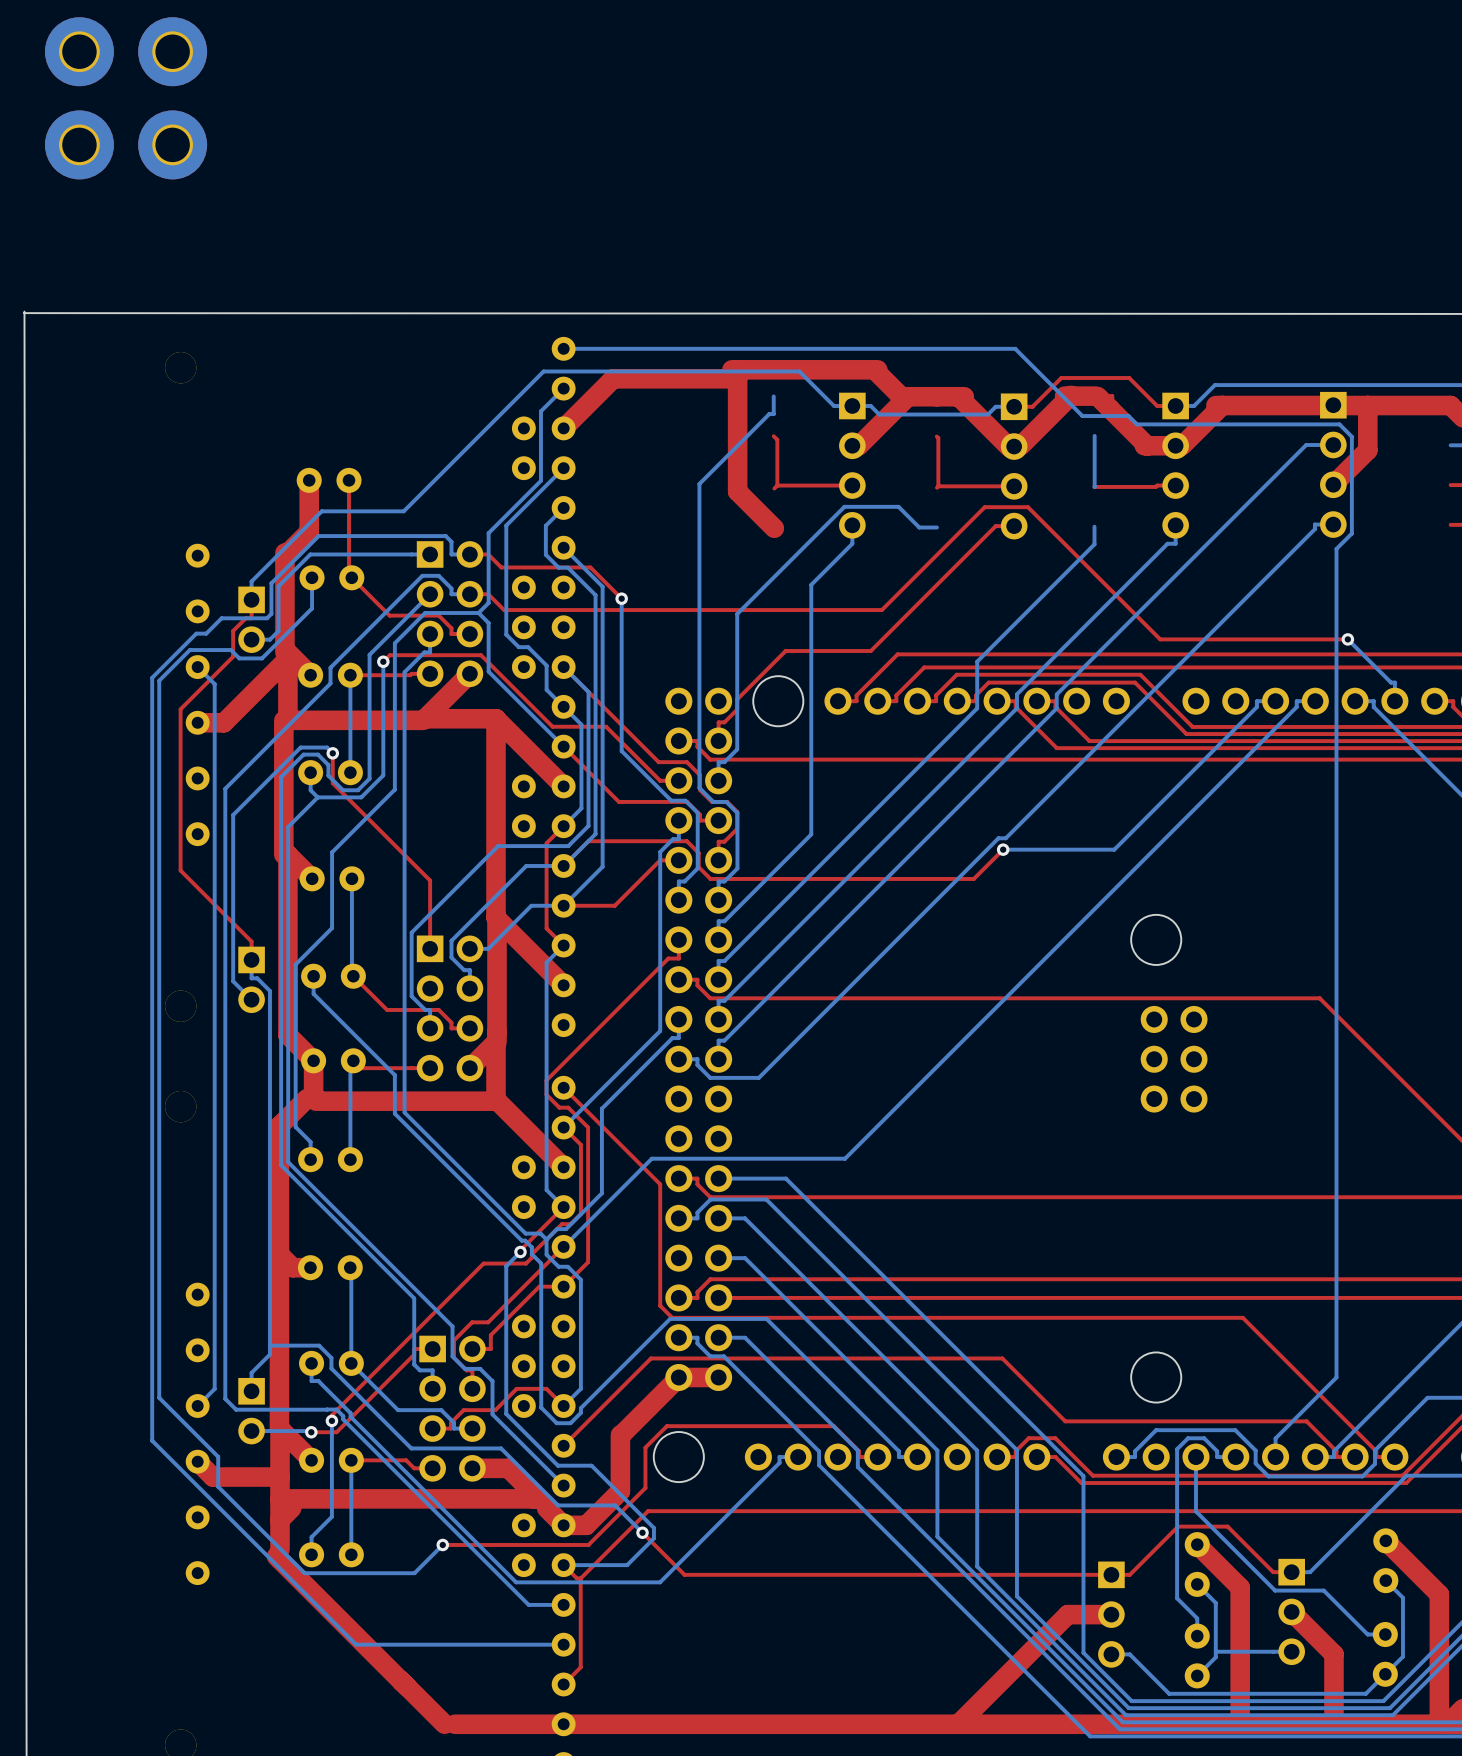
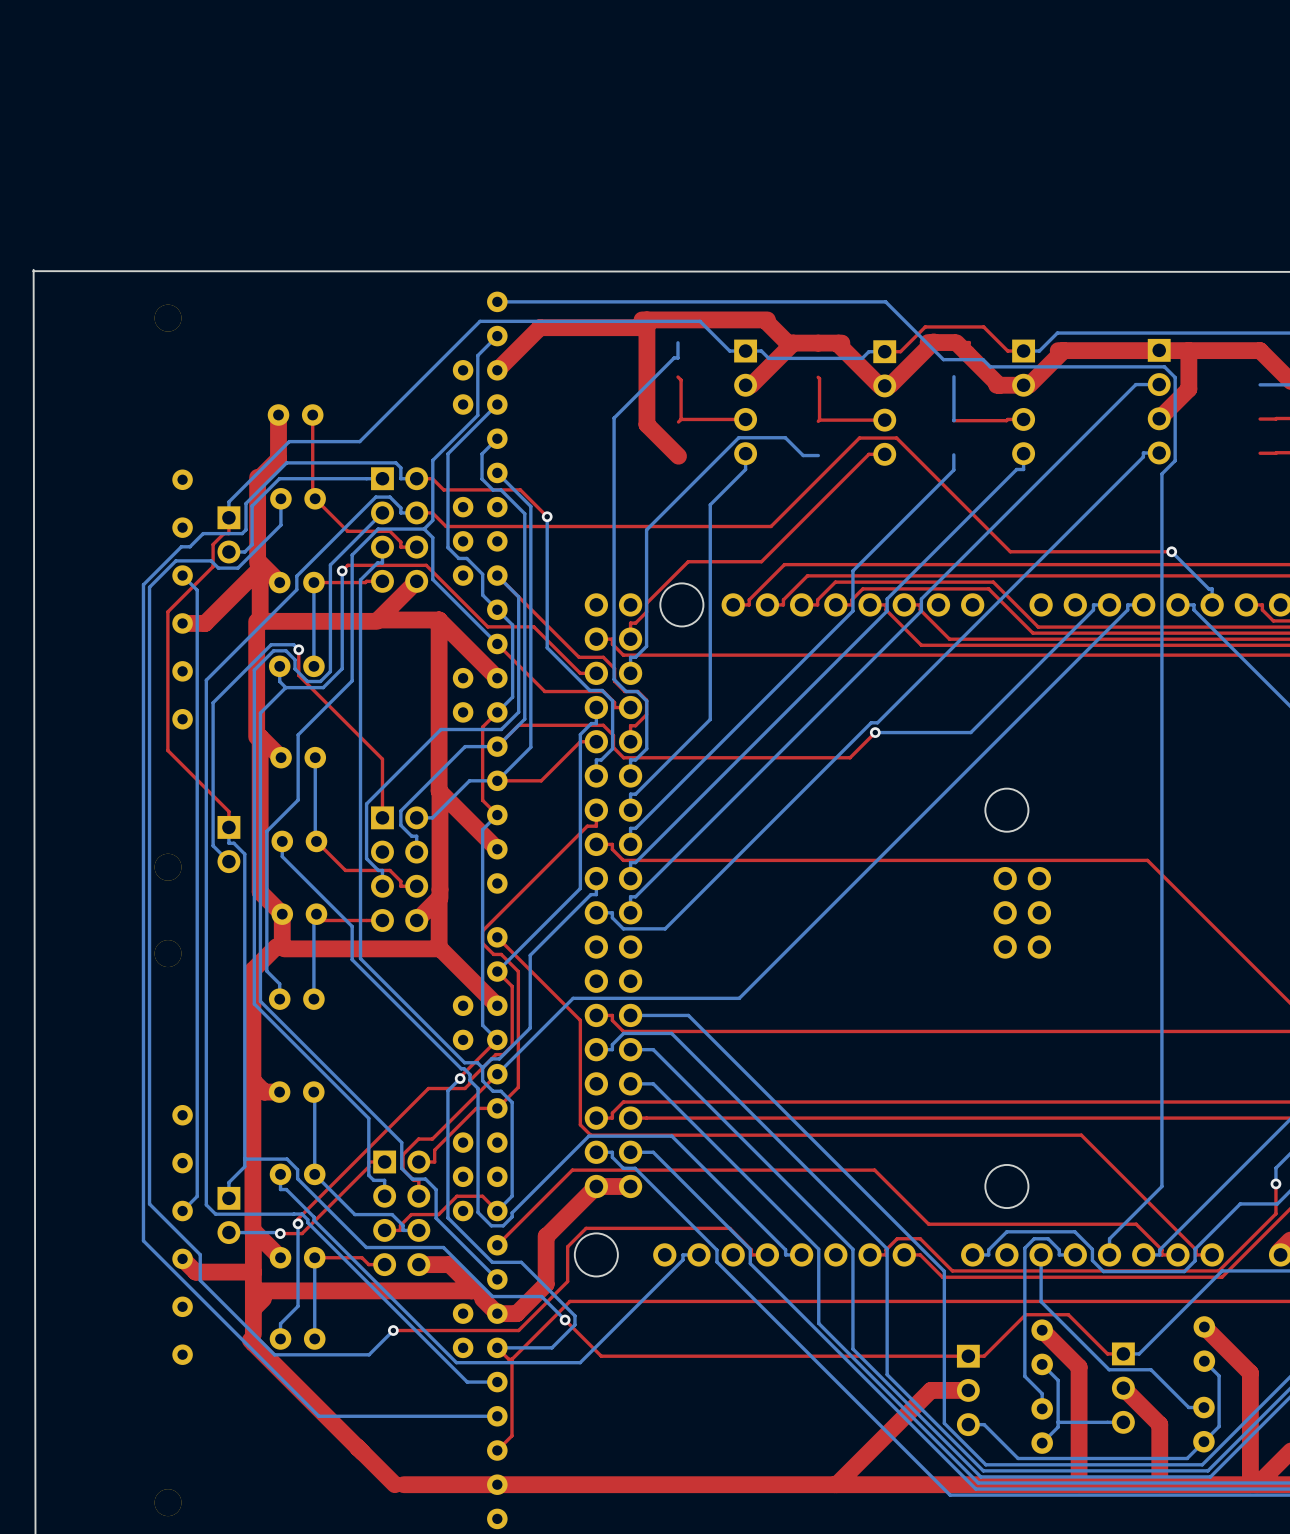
part: (79, 51) -> none
part: (172, 51) -> none
part: (79, 144) -> none
part: (172, 144) -> none

